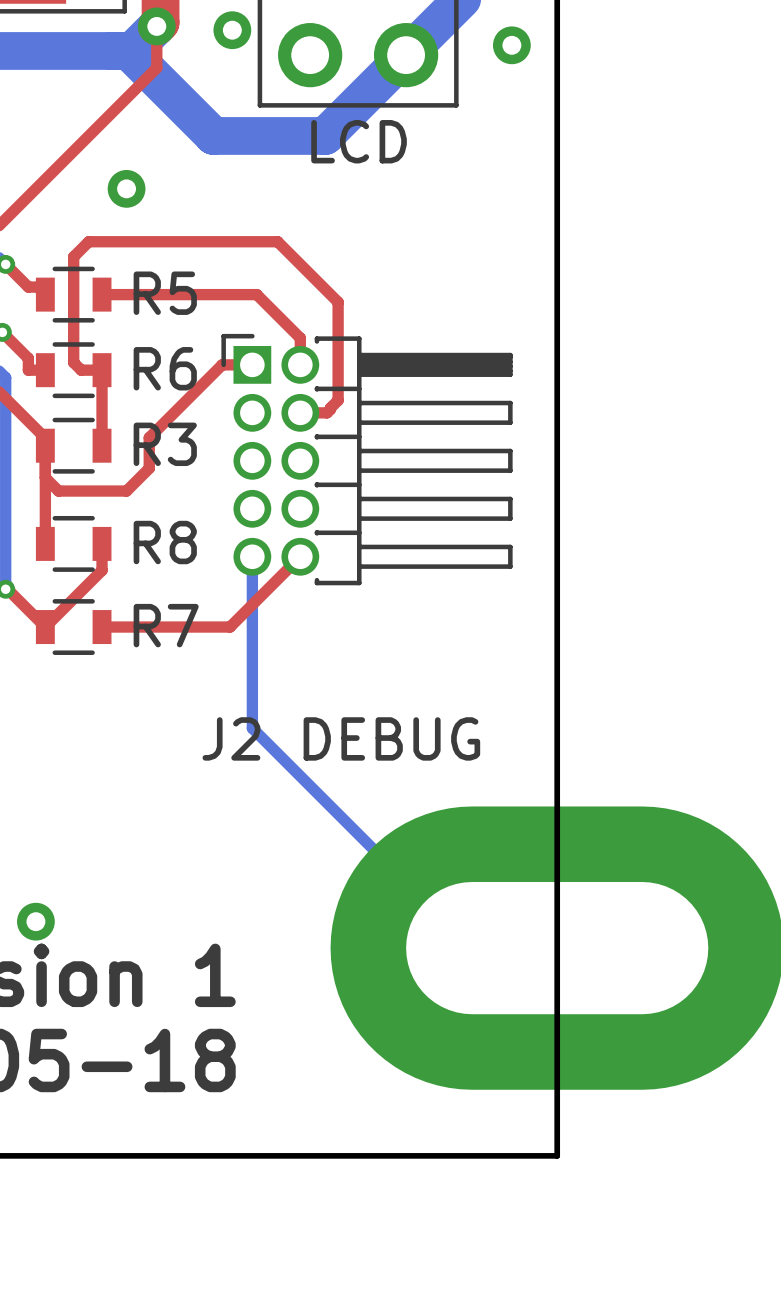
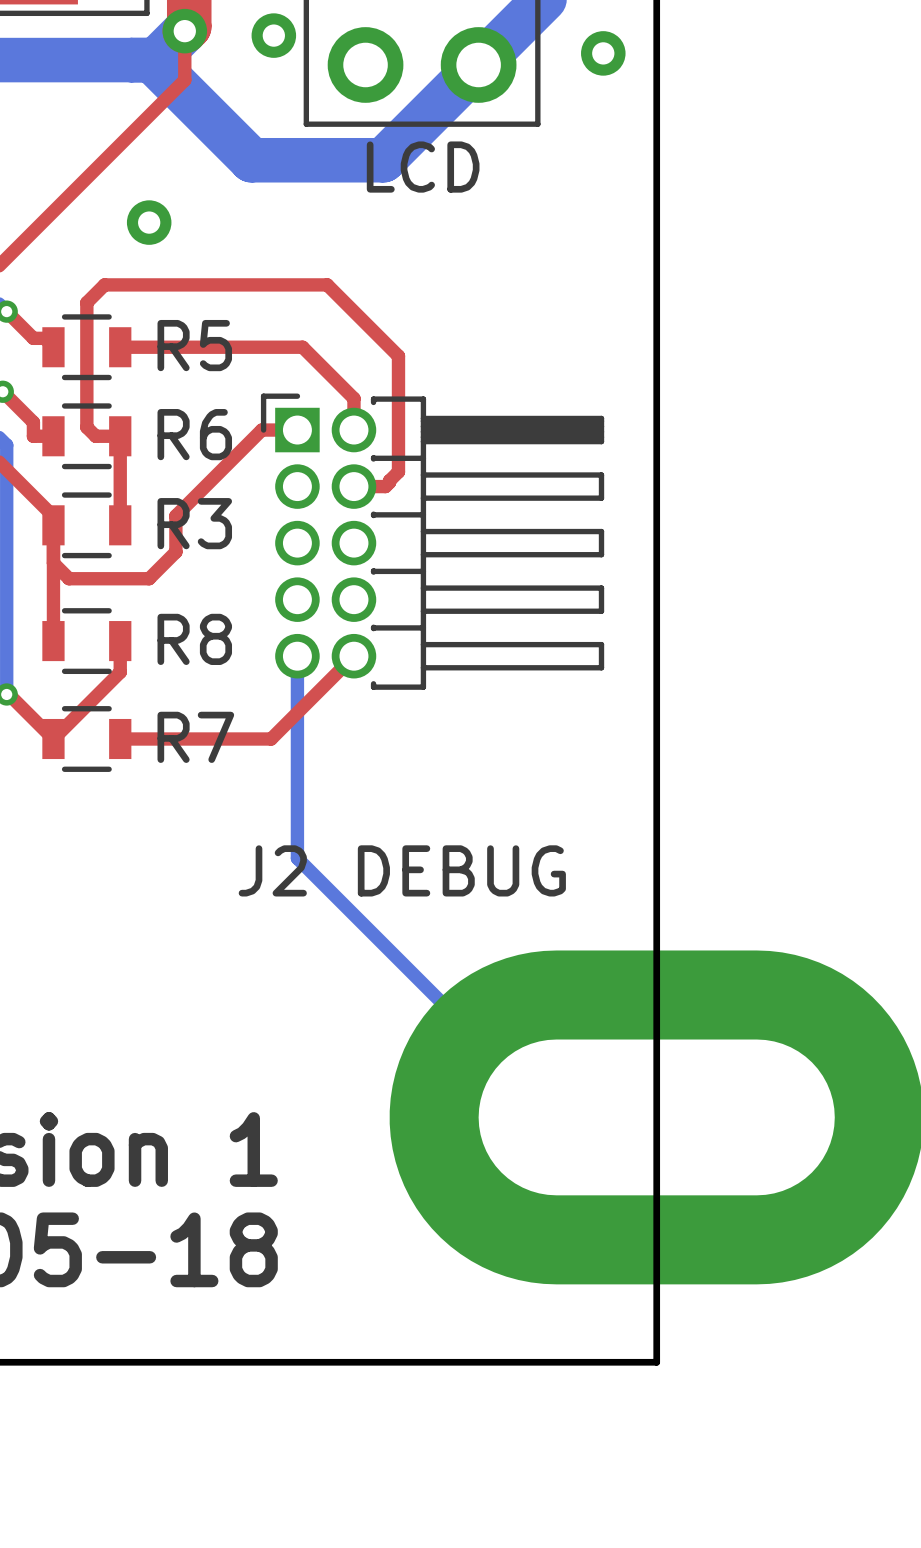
part: (35, 921) -> none

